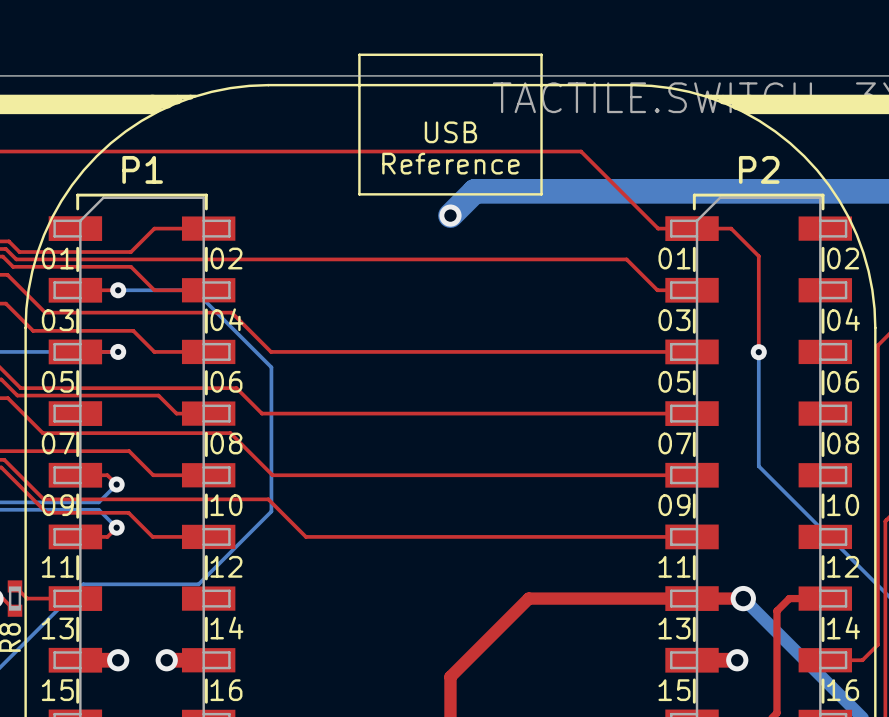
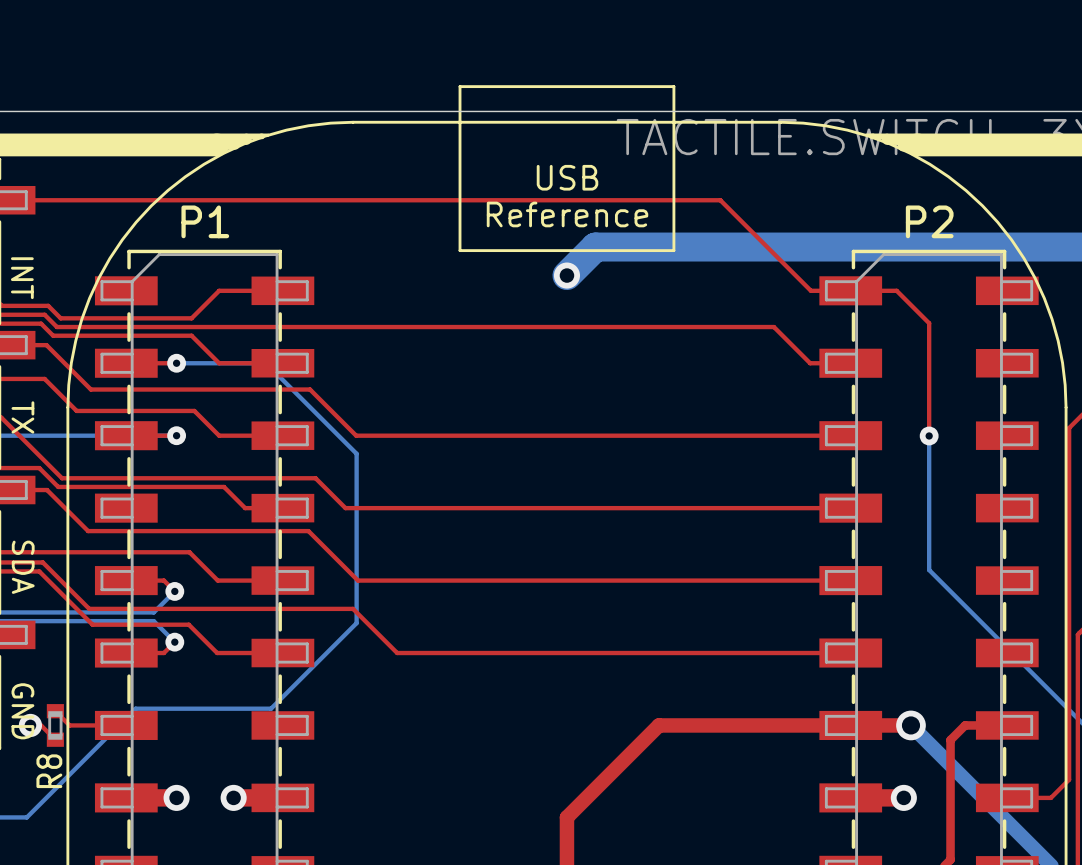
text: 01 (57, 258) -> none
text: 02 (226, 258) -> none
text: 01 (674, 258) -> none
text: 02 (843, 258) -> none
text: 04 (226, 319) -> none
text: 04 (843, 319) -> none
text: 03 (57, 320) -> none
text: 03 (674, 320) -> none
text: 05 (57, 381) -> none
text: 06 (226, 381) -> none
text: 05 (674, 381) -> none
text: 06 (843, 381) -> none
text: 07 (58, 443) -> none
text: 08 (226, 443) -> none
text: 07 (674, 443) -> none
text: 08 (843, 443) -> none
text: 09 (57, 505) -> none
text: 10 (226, 505) -> none
text: 09 (674, 505) -> none
text: 10 (843, 505) -> none
text: 11 (57, 566) -> none
text: 12 (226, 566) -> none
text: 11 (674, 566) -> none
text: 12 (843, 566) -> none
text: 13 (57, 628) -> none
text: 14 (226, 628) -> none
text: 13 (674, 628) -> none
text: 14 (843, 628) -> none
text: 15 (57, 690) -> none
text: 16 (226, 690) -> none
text: 15 (674, 690) -> none
text: 16 (843, 690) -> none

